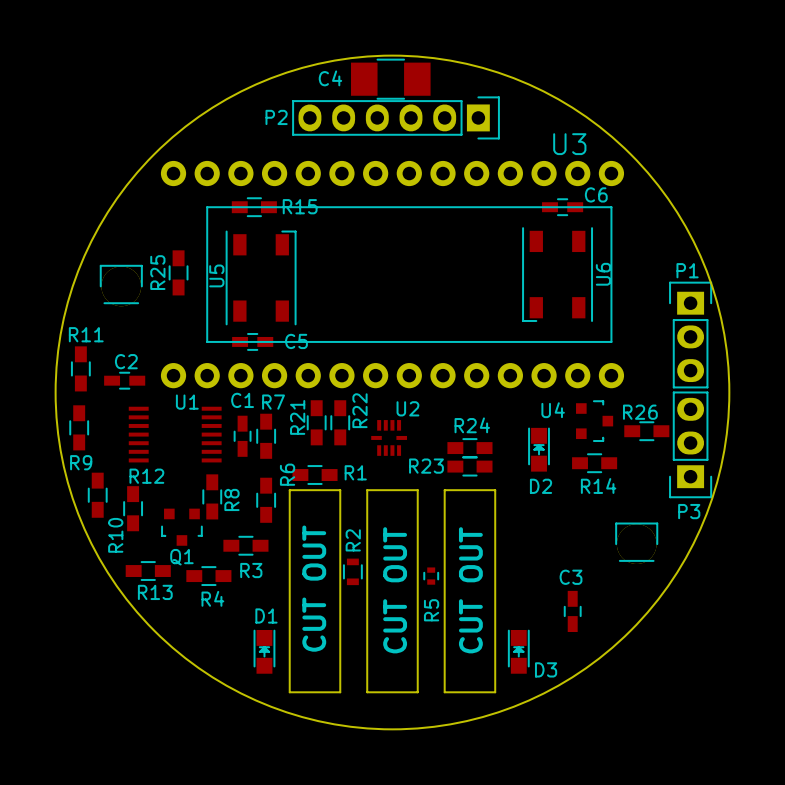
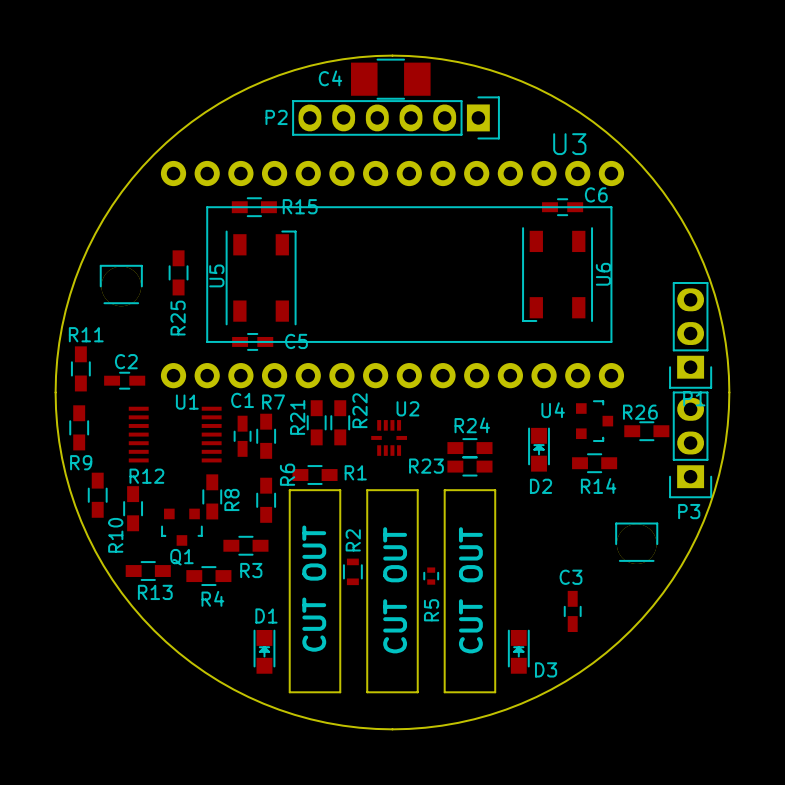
round board edge: [54, 54, 731, 731] -> none
board edge: none -> (392, 55) (425, 57) (458, 62) (490, 70) (521, 81) (551, 95) (579, 112) (606, 132) (630, 154) (652, 178) (672, 205) (689, 233) (703, 263) (714, 294) (722, 326) (727, 359) (729, 392) (727, 425) (722, 458) (714, 490) (703, 521) (689, 551) (672, 579) (652, 606) (630, 630) (606, 652) (579, 672) (551, 689) (521, 703) (490, 714) (458, 722) (425, 727) (392, 729) (359, 727) (326, 722) (294, 714) (263, 703) (233, 689) (205, 672) (178, 652) (154, 630) (132, 606) (112, 579) (95, 551) (81, 521) (70, 490) (62, 458) (57, 425) (55, 392) (57, 359) (62, 326) (70, 294) (81, 263) (95, 233) (112, 205) (132, 178) (154, 154) (178, 132) (205, 112) (233, 95) (263, 81) (294, 70) (326, 62) (359, 57) (392, 55)
R25 name position: R25 (157, 272) -> R25 (178, 318)
P1 rotation: 0° (690, 335) -> 180° (690, 335)

